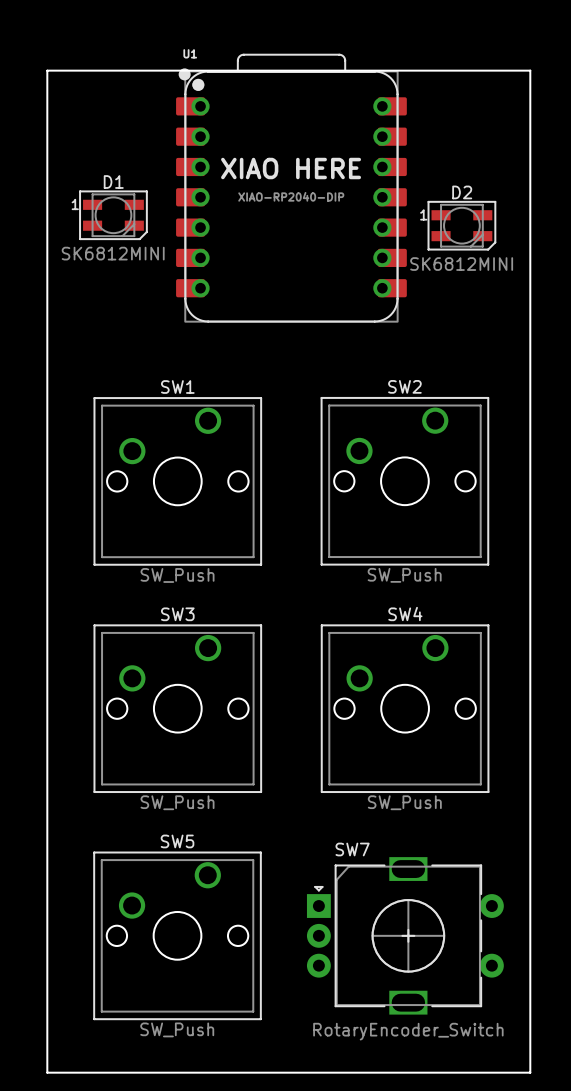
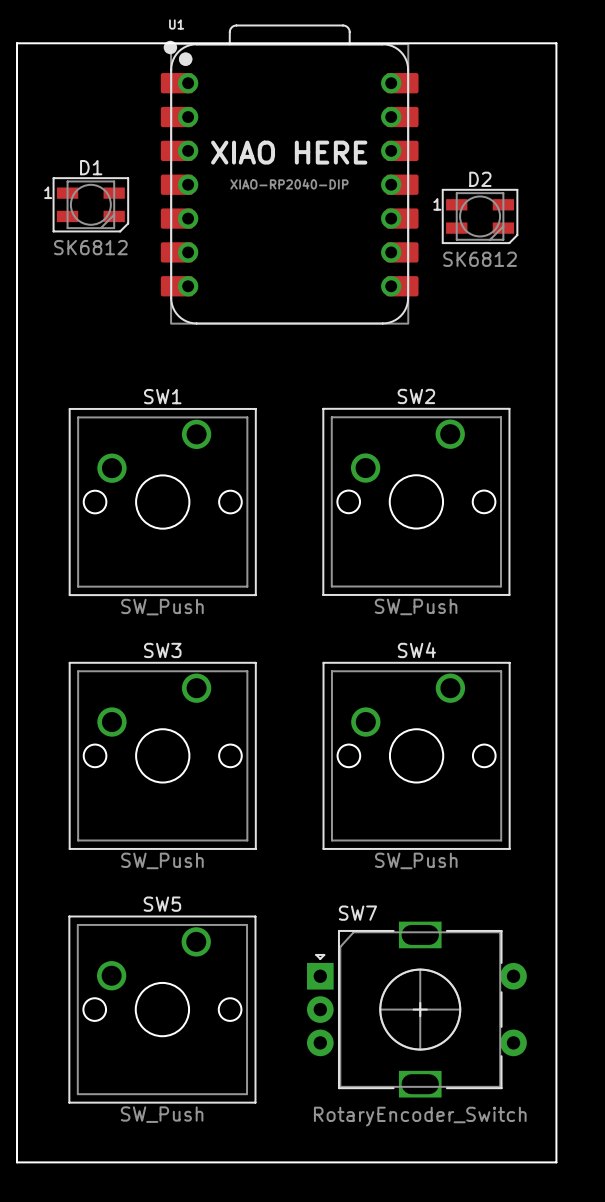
D1 value: SK6812MINI (113, 253) -> SK6812 (90, 247)
D2 value: SK6812MINI (461, 264) -> SK6812 (480, 259)

